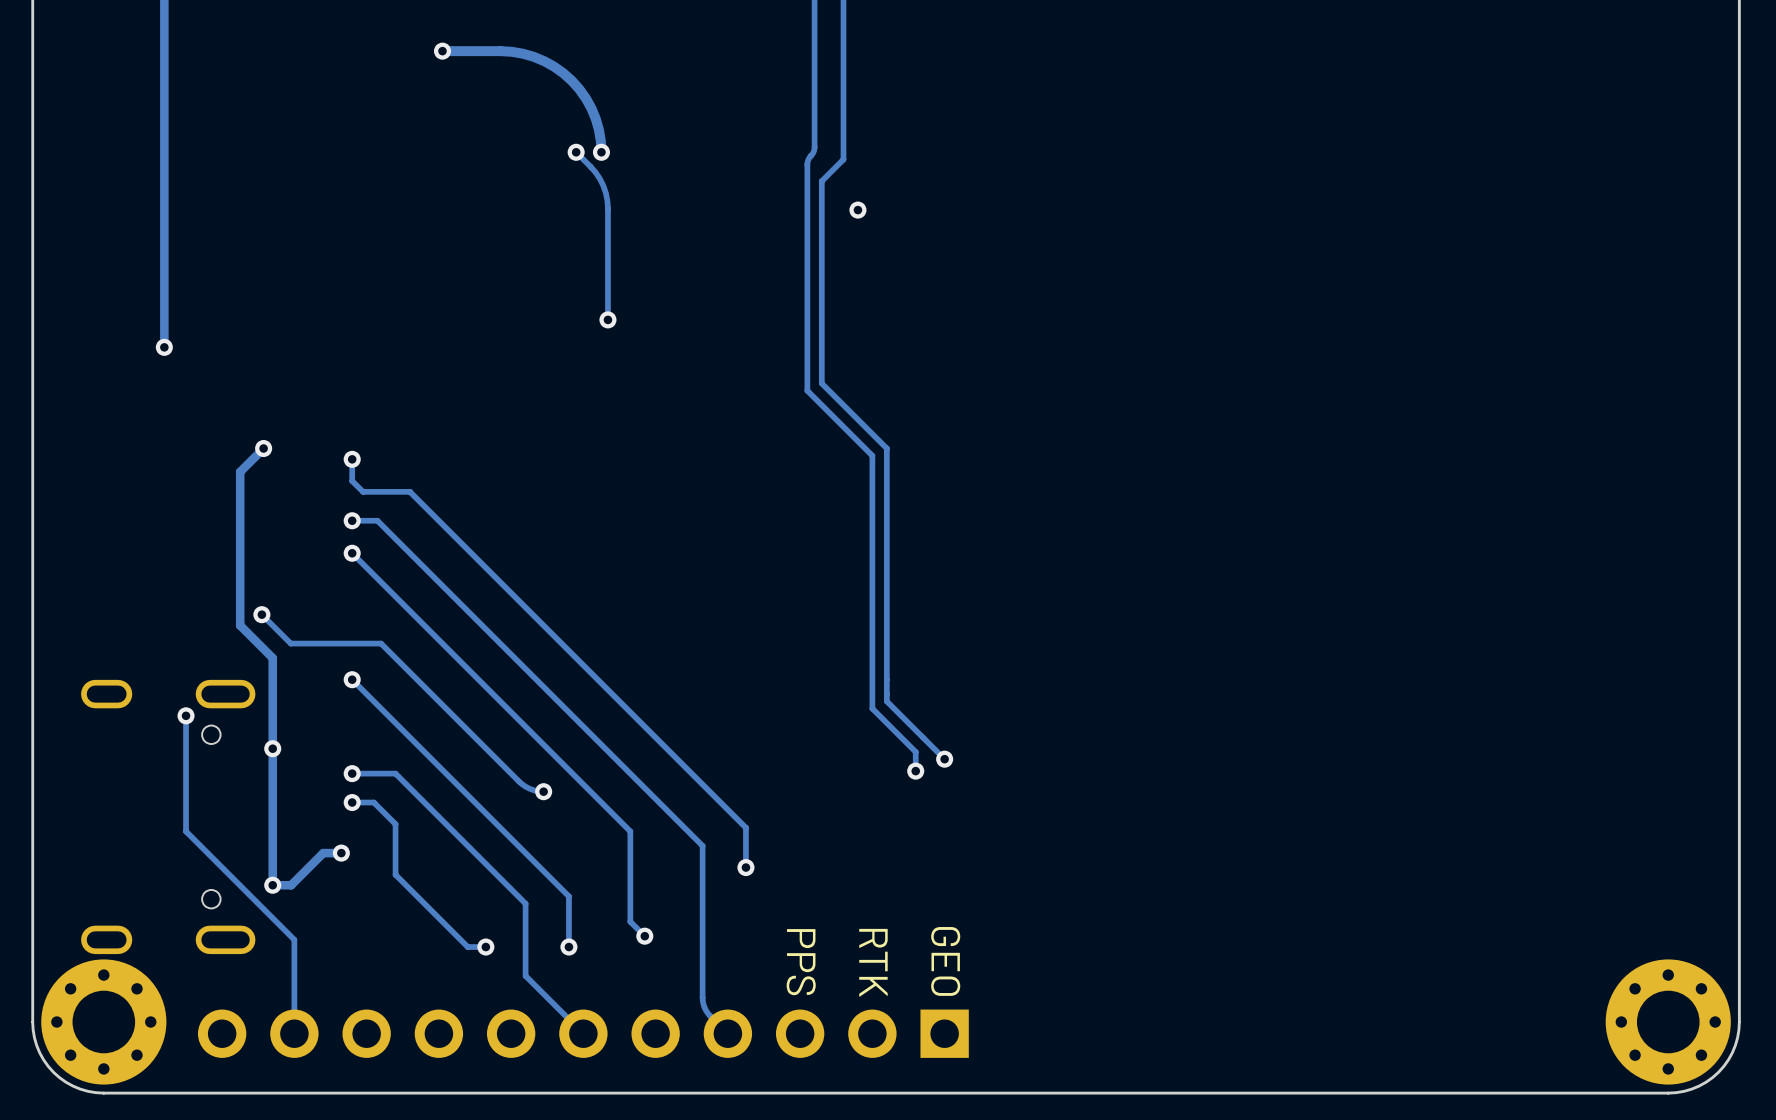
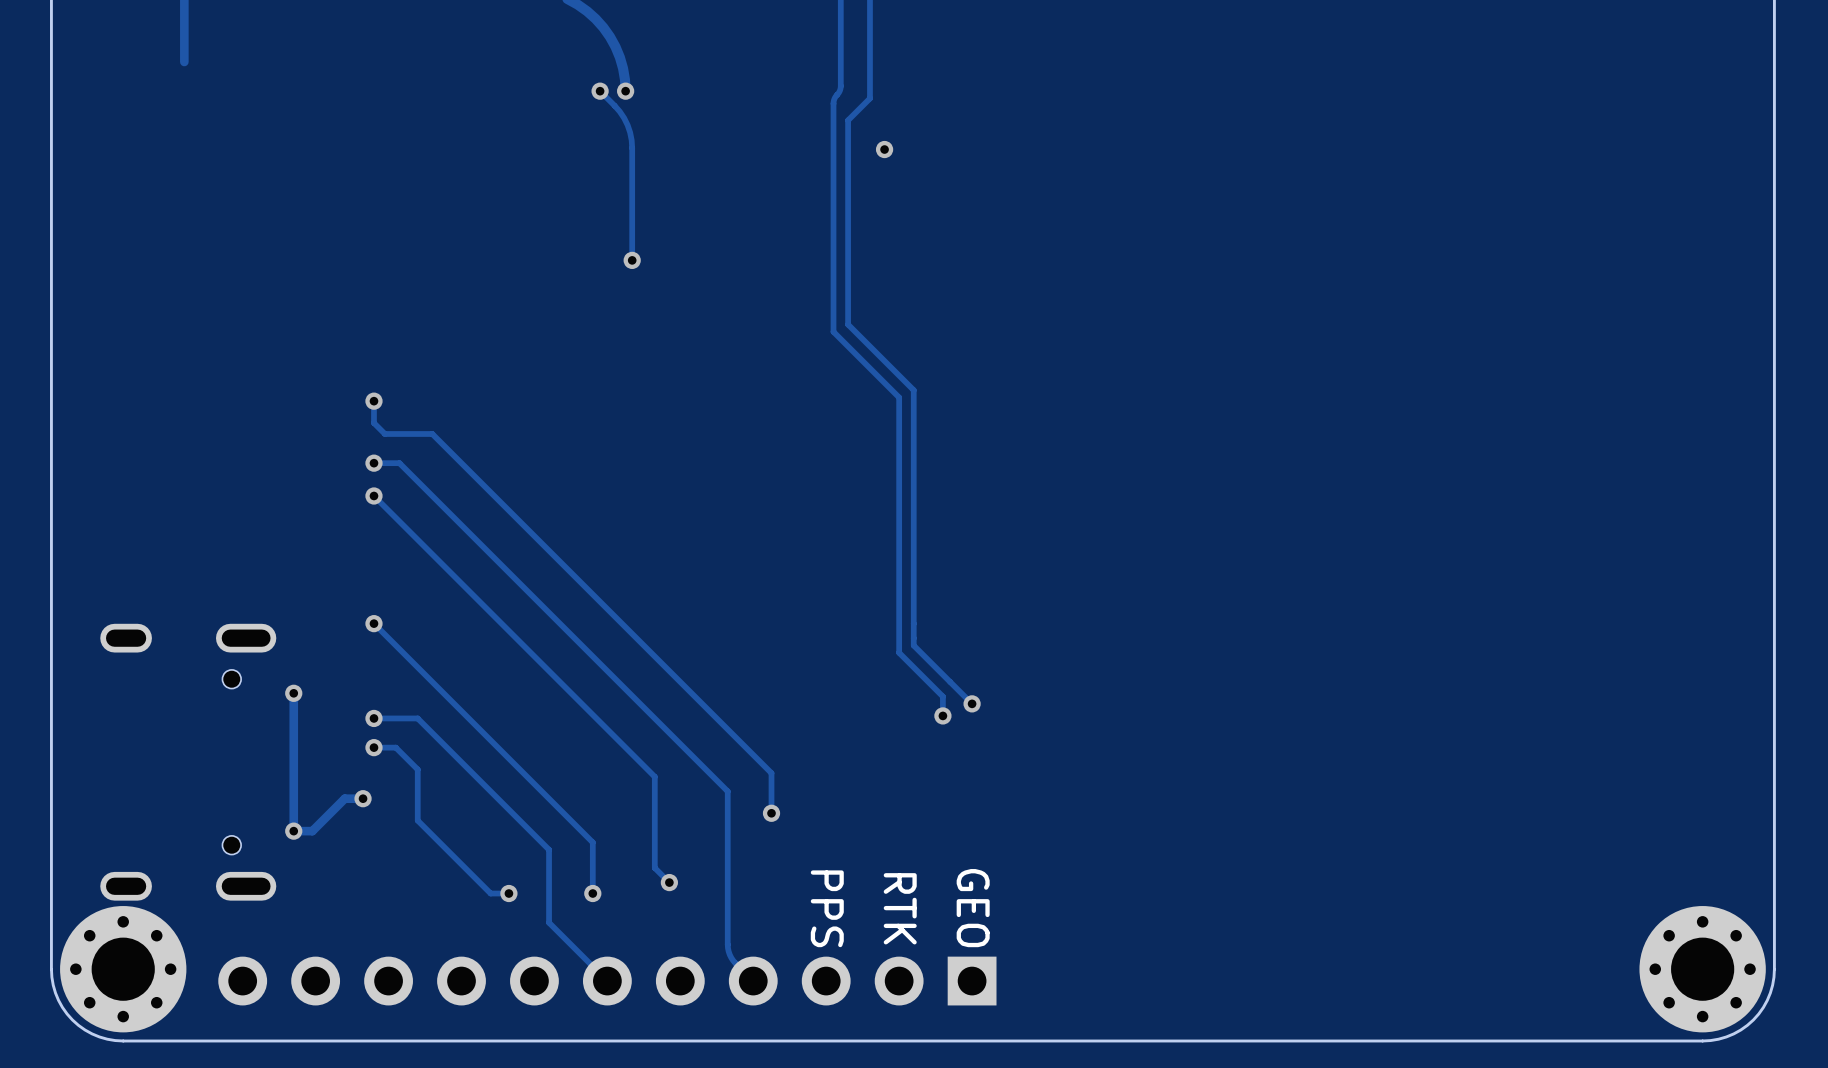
track: (164, 123) (164, 347) -> none
via: (164, 347) -> none
track: (263, 448) (240, 471) (240, 625) (272, 658) (272, 748) -> none
via: (263, 448) -> none
track: (261, 614) (290, 643) (381, 643) (518, 781) (530, 789) (543, 791) -> none
via: (261, 614) -> none
track: (186, 715) (186, 831) (294, 939) (294, 1033) -> none
via: (186, 715) -> none
via: (543, 791) -> none

